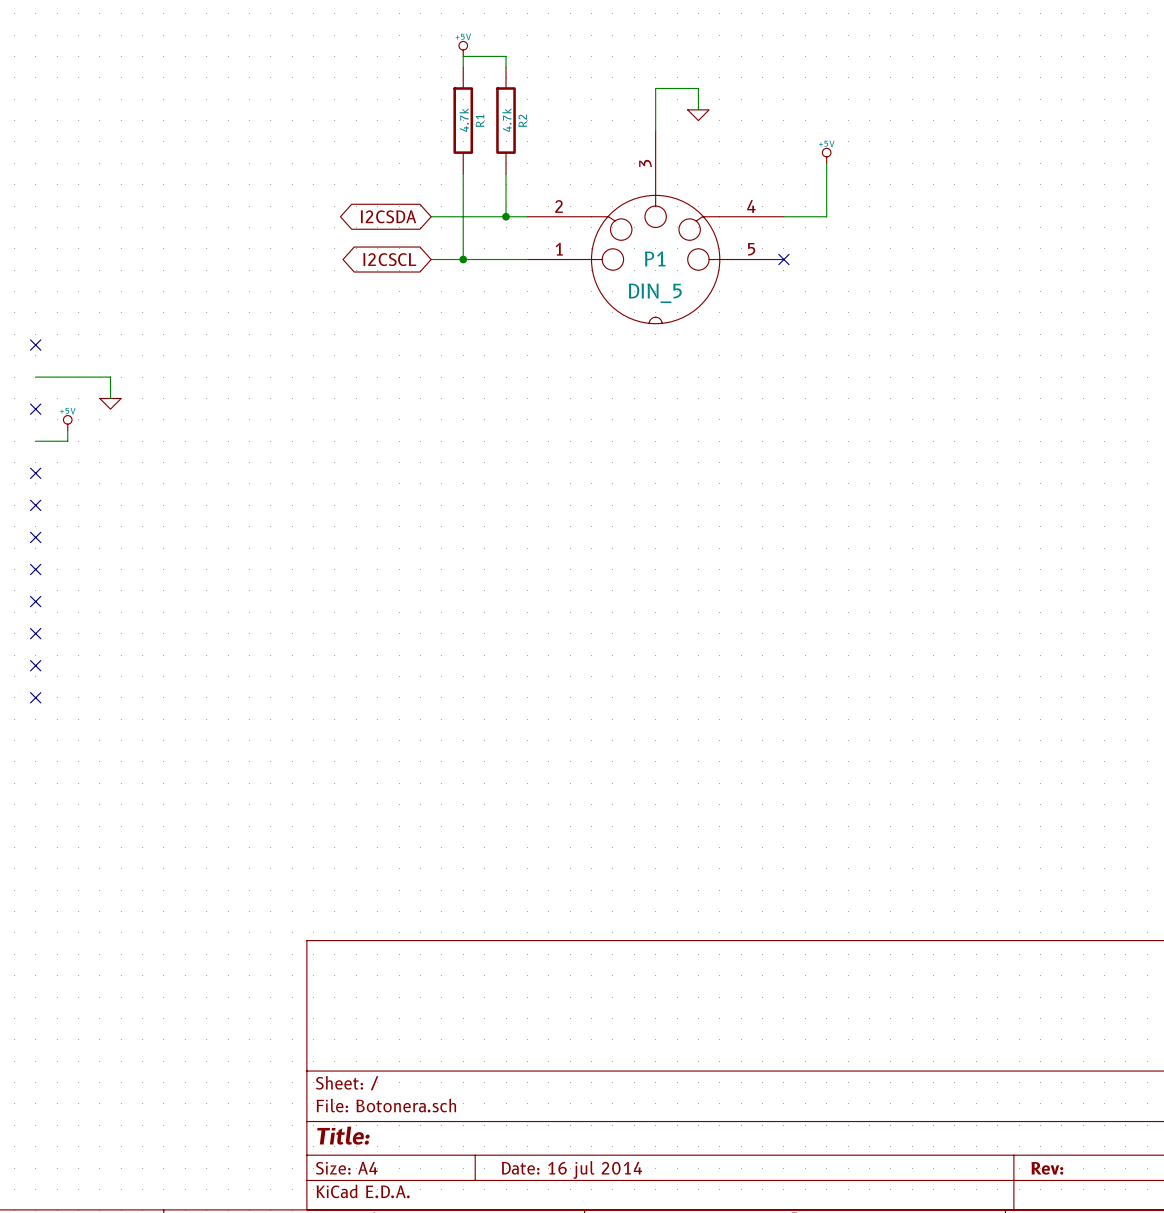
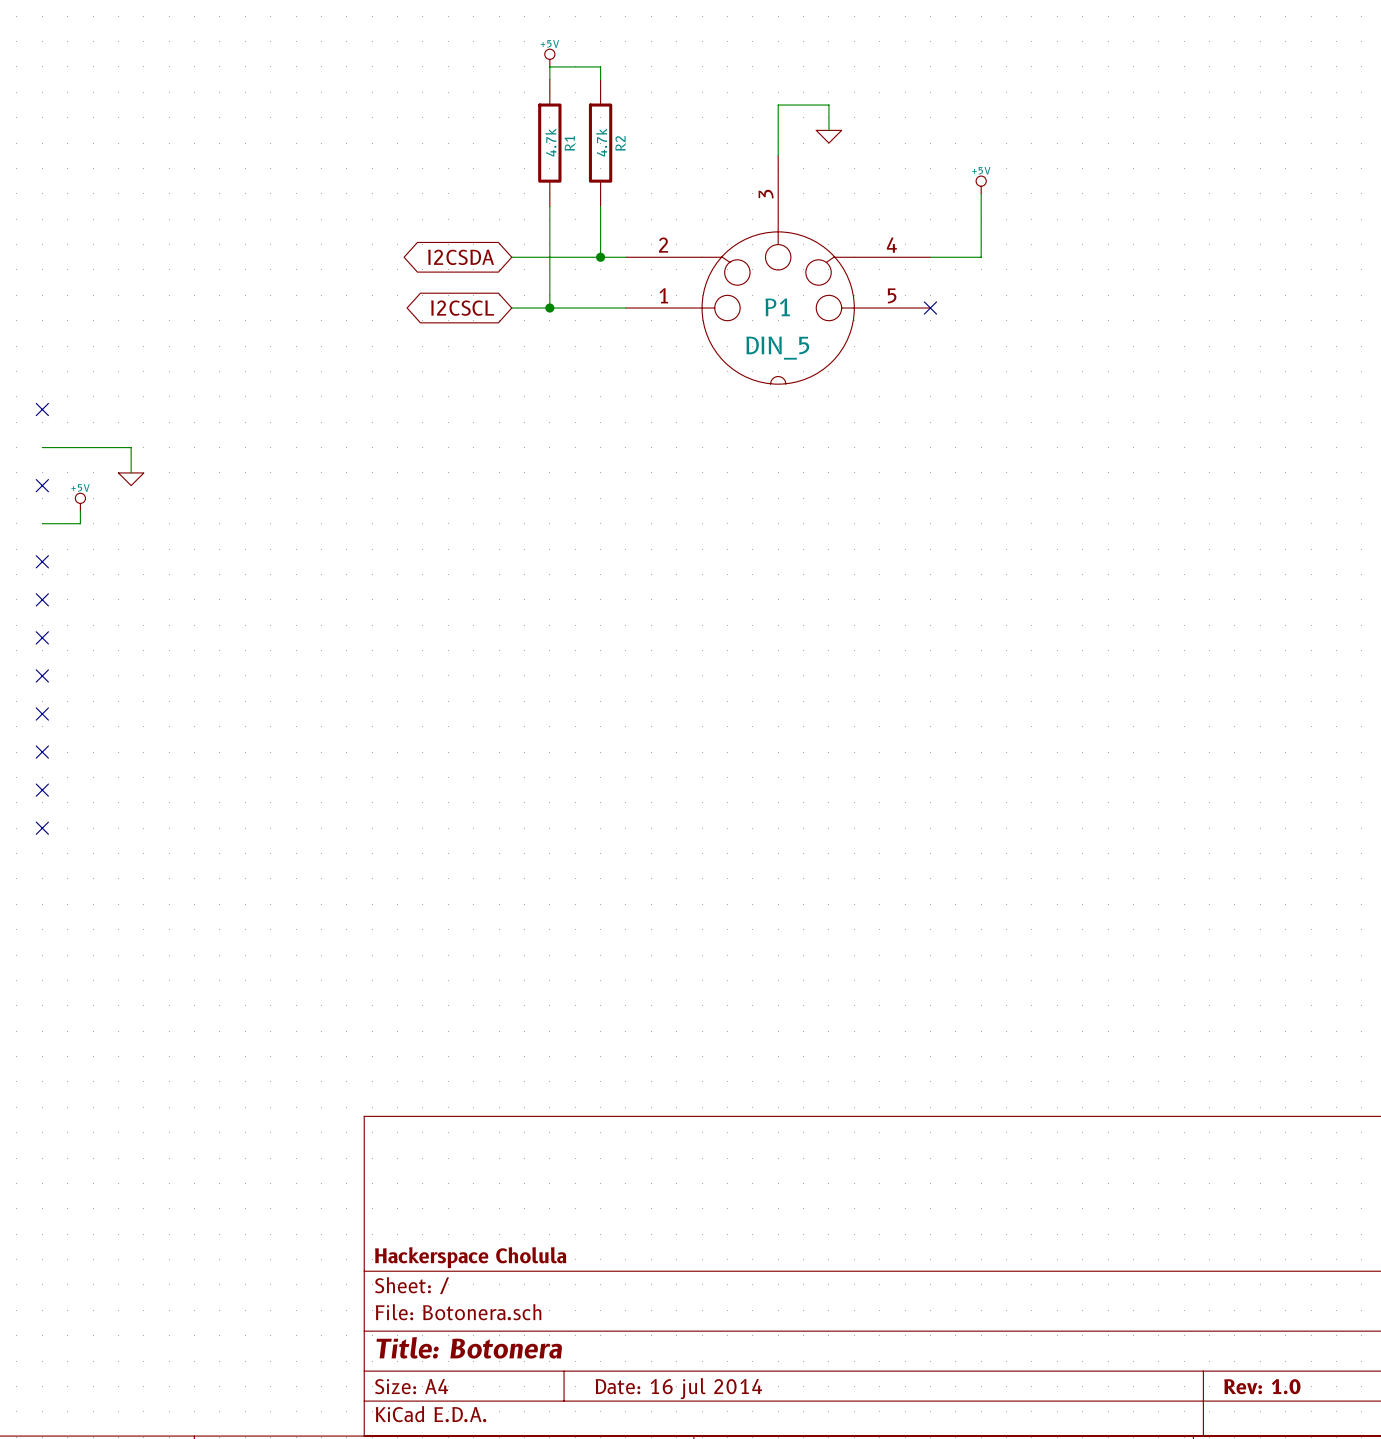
title block: none -> Hackerspace Cholula (470, 1257)
title block: Title: (343, 1135) -> Title: Botonera (469, 1347)
title block: Rev: (1047, 1168) -> Rev: 1.0 (1262, 1386)

